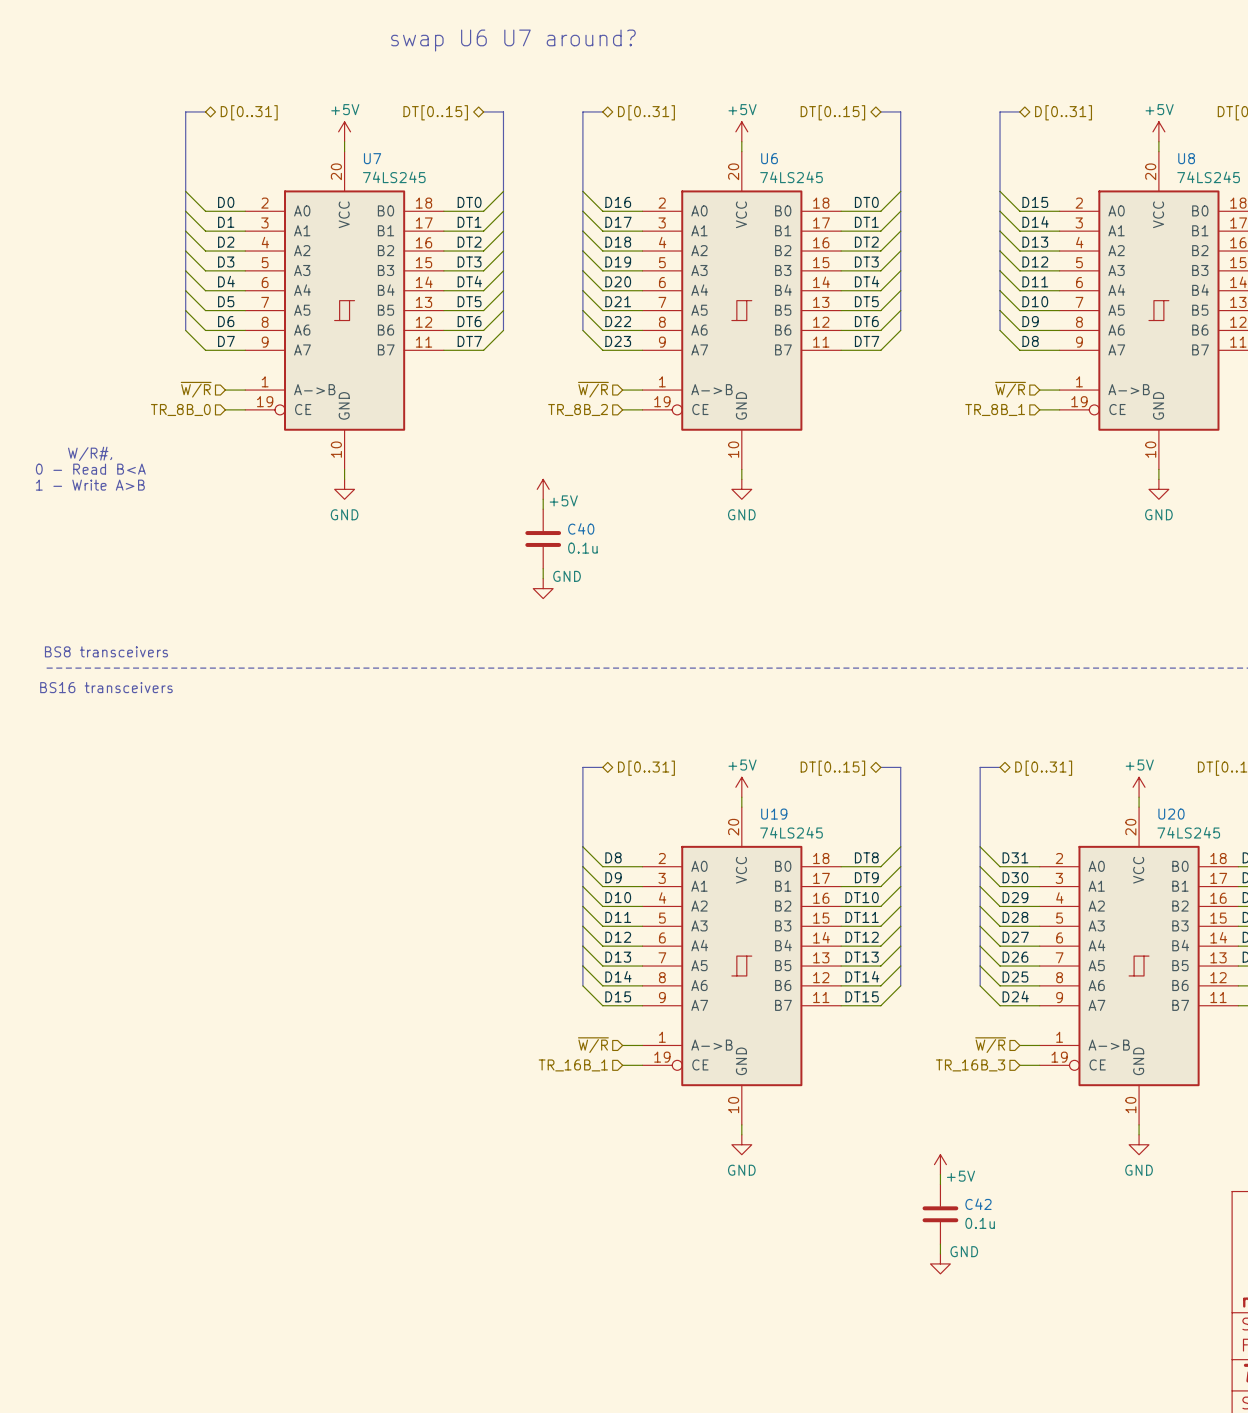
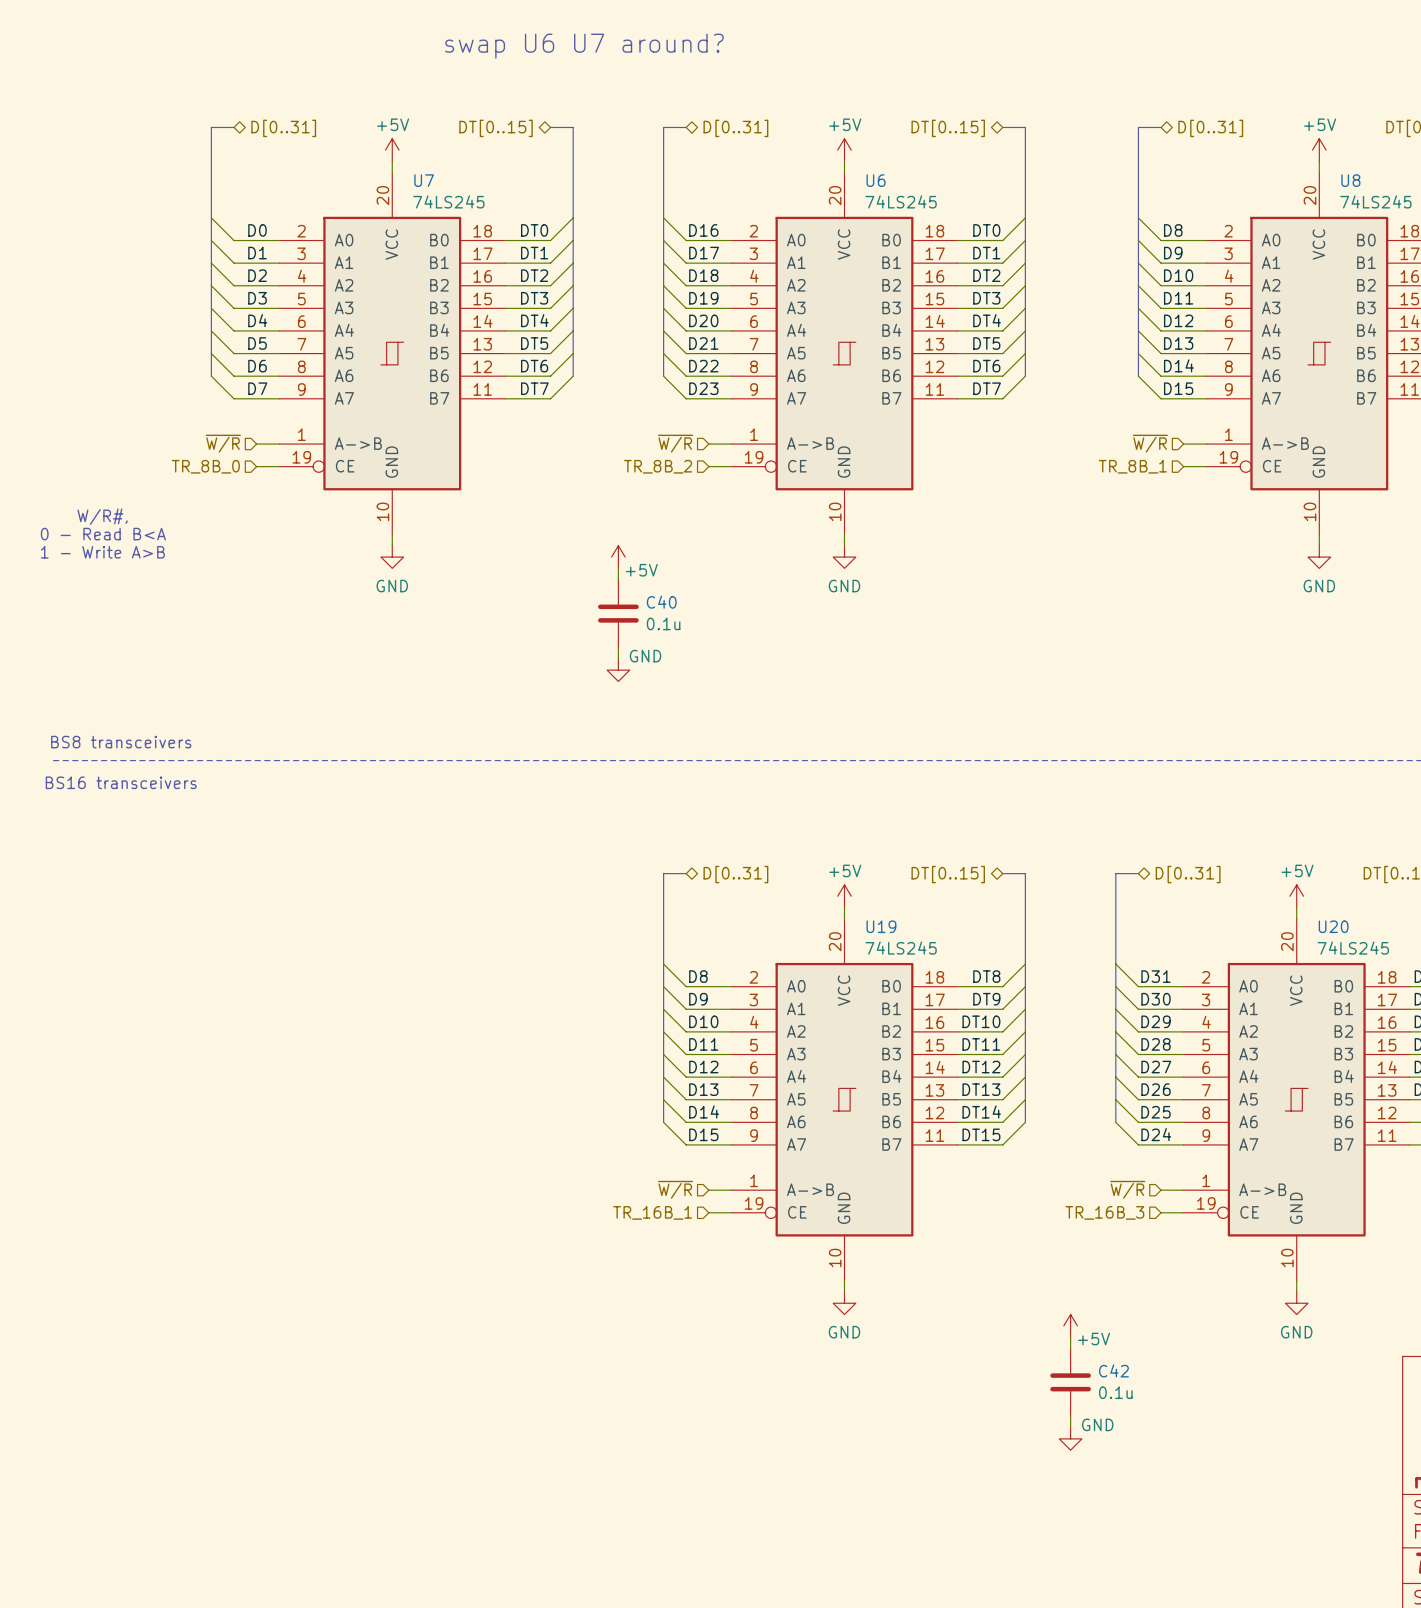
label: D15 (1035, 202) -> D8 (1173, 230)
label: D14 (1035, 222) -> D9 (1173, 253)
label: D13 (1035, 242) -> D10 (1178, 275)
label: D12 (1035, 262) -> D11 (1178, 298)
label: D11 (1035, 281) -> D12 (1178, 320)
label: D10 (1035, 301) -> D13 (1178, 343)
label: D9 (1030, 321) -> D14 (1178, 365)
label: D8 (1030, 341) -> D15 (1178, 388)

